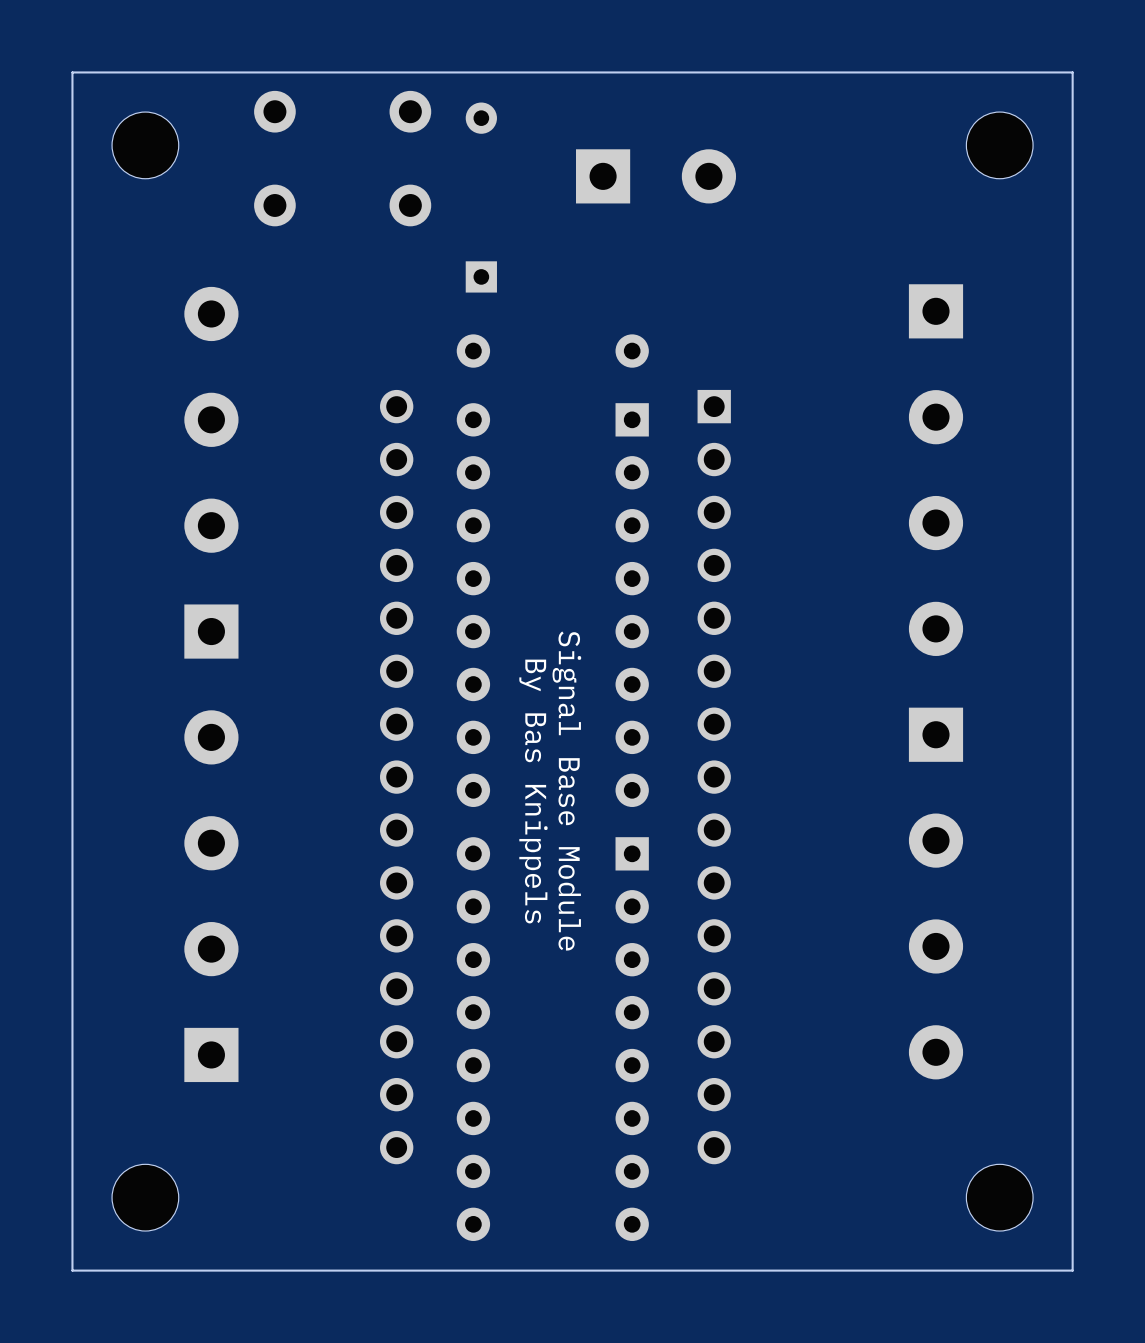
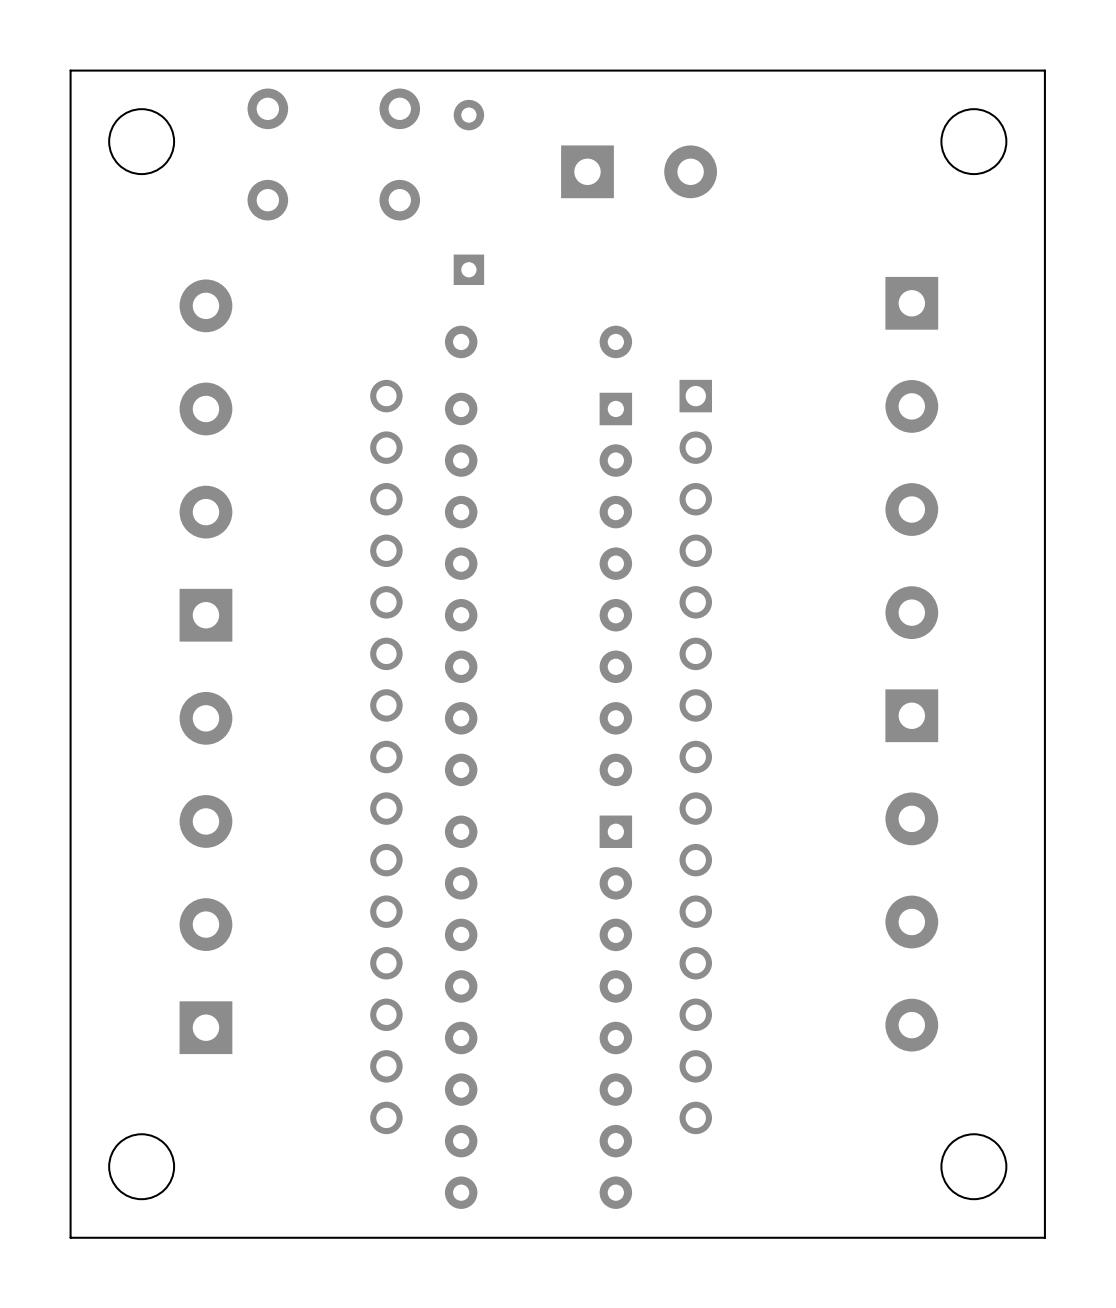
text: By Bas Knippels (533, 791) -> none
text: Signal Base Module (566, 791) -> none

